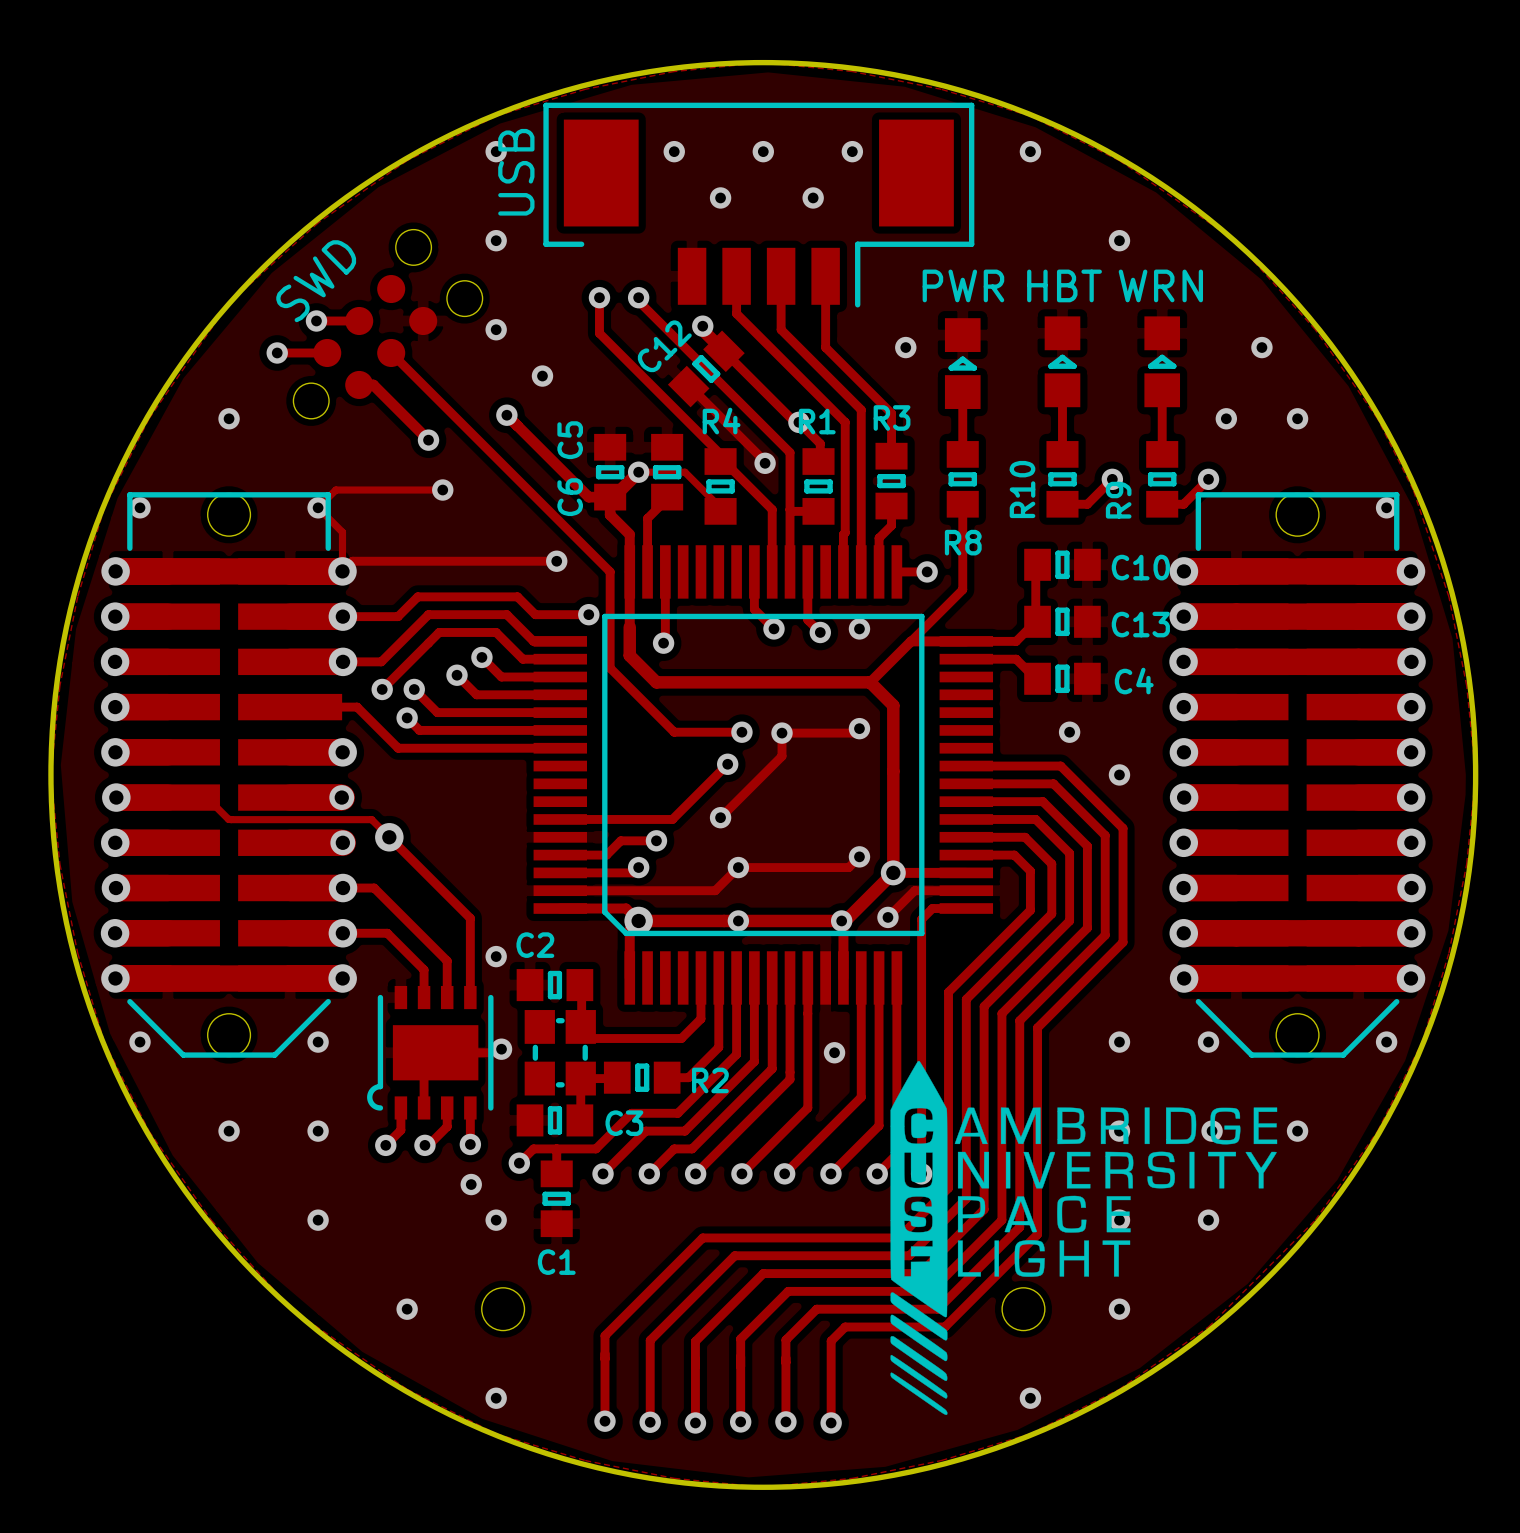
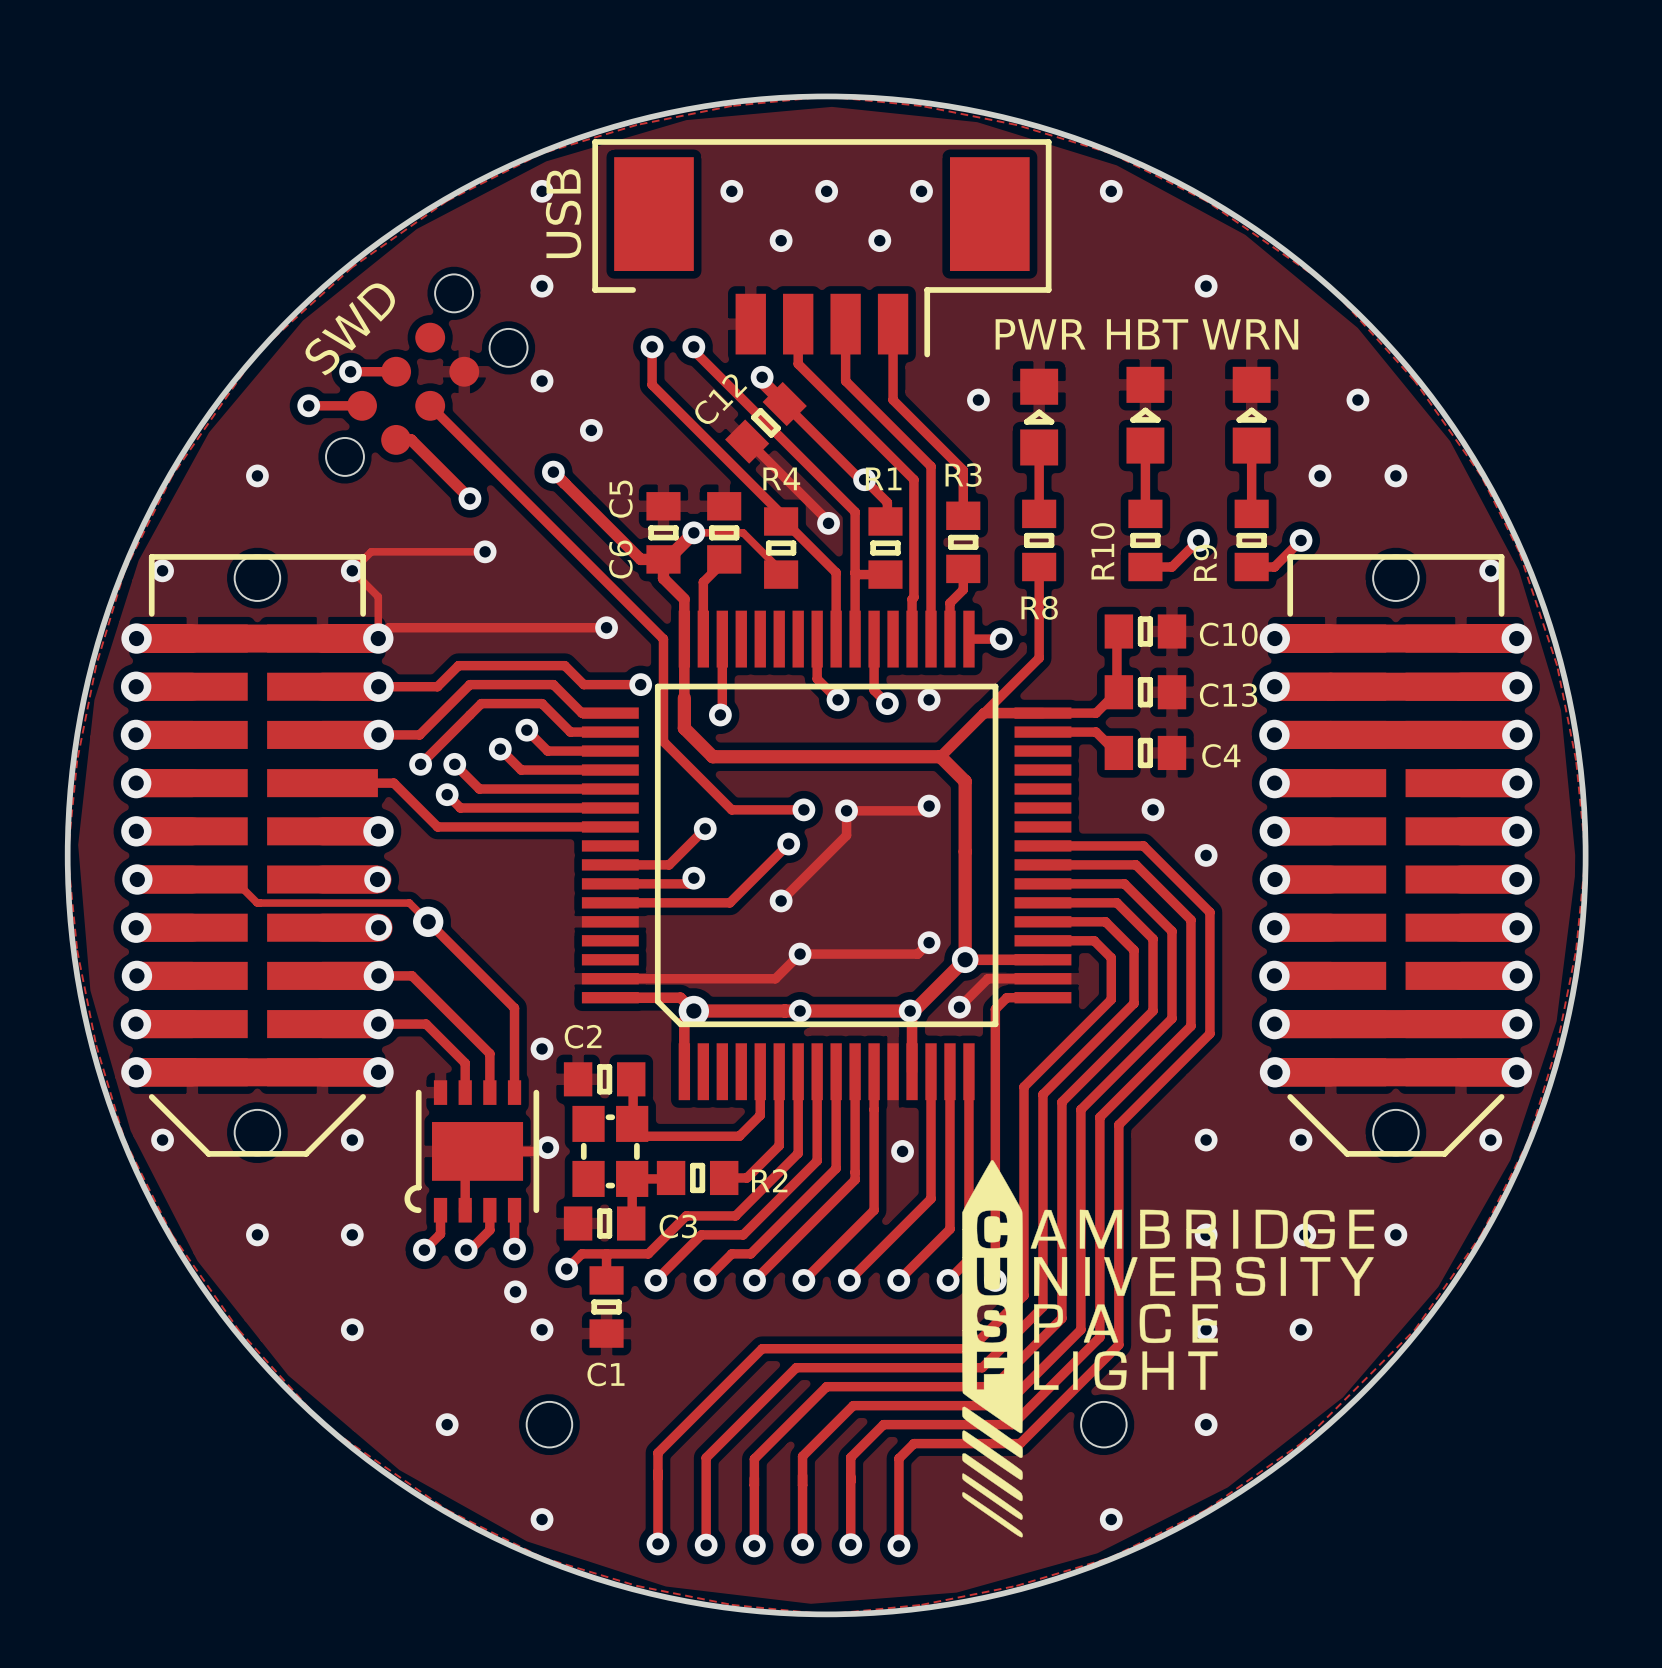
track: none -> (705, 828) (669, 864) (610, 864)
via: none -> (705, 828)
via: none -> (693, 878)
track: (656, 840) (620, 840) (606, 855) (560, 855) -> none
via: (656, 840) -> none
track: (638, 867) (633, 872) (560, 872) -> (693, 878) (688, 883) (610, 883)
via: (638, 867) -> none

